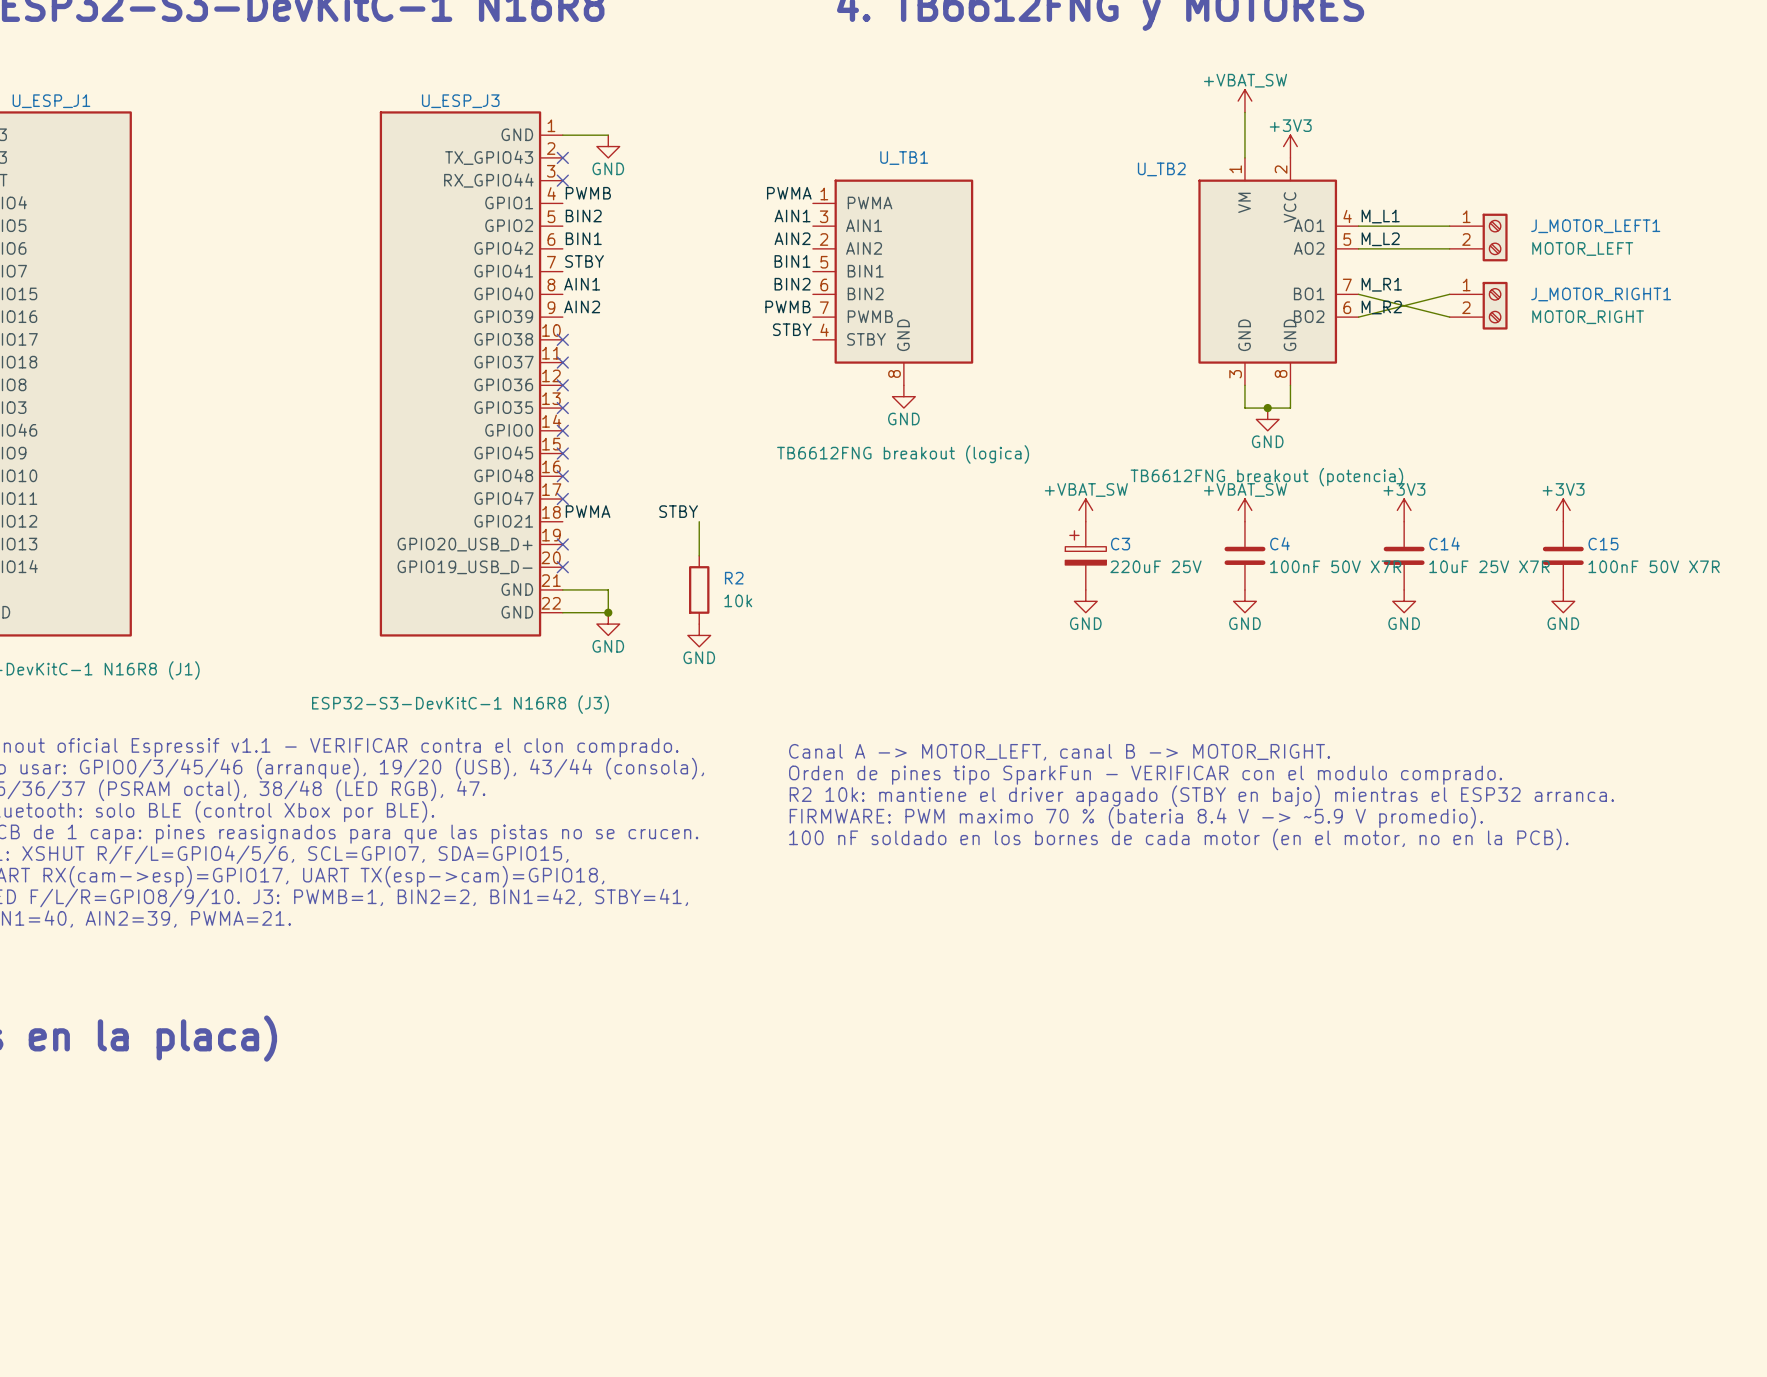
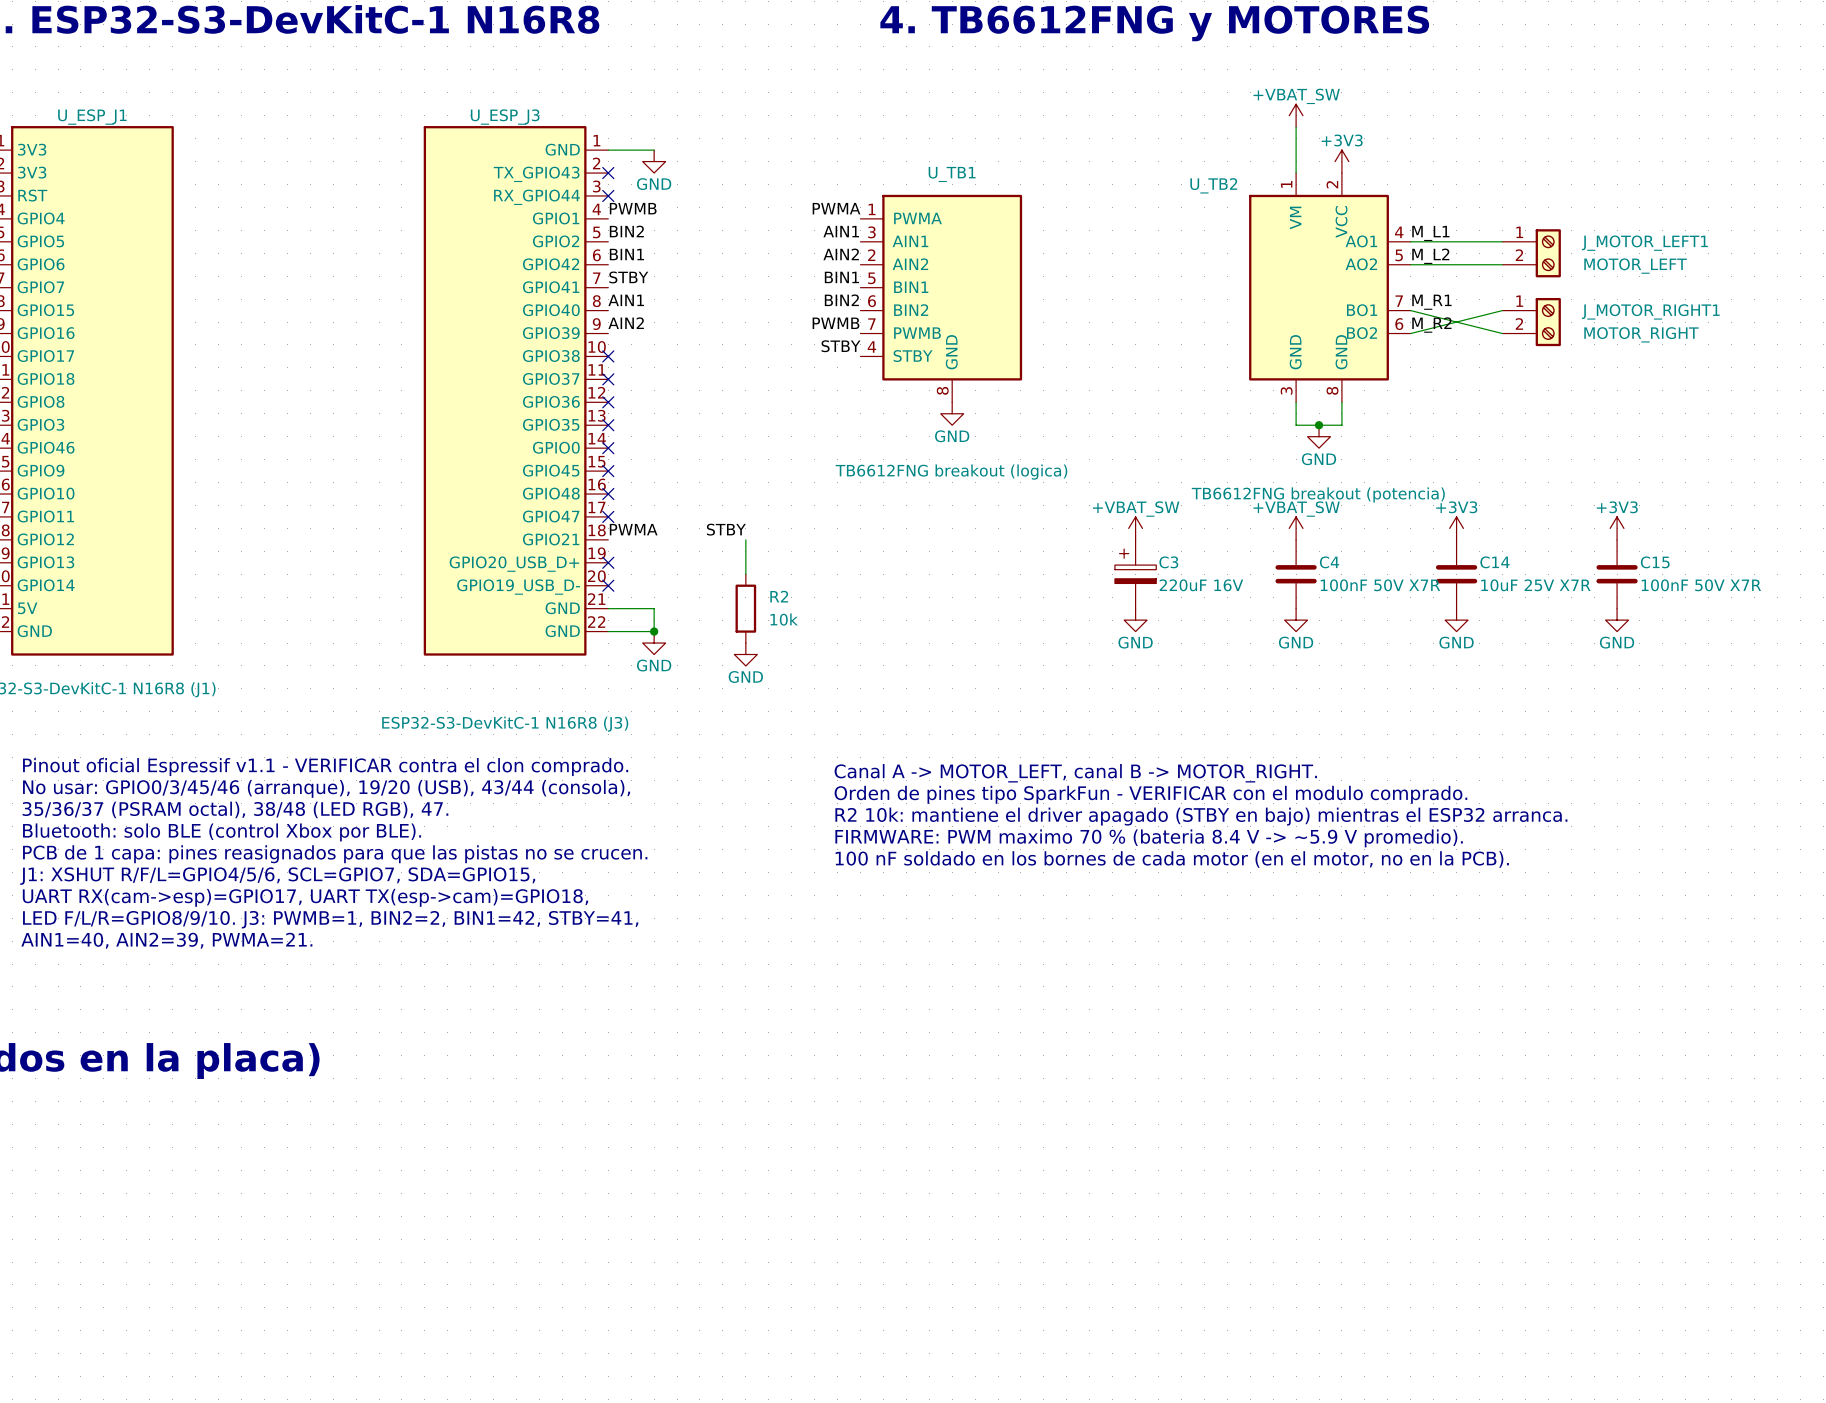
C3 value: 220uF 25V (1156, 566) -> 220uF 16V (1201, 585)

